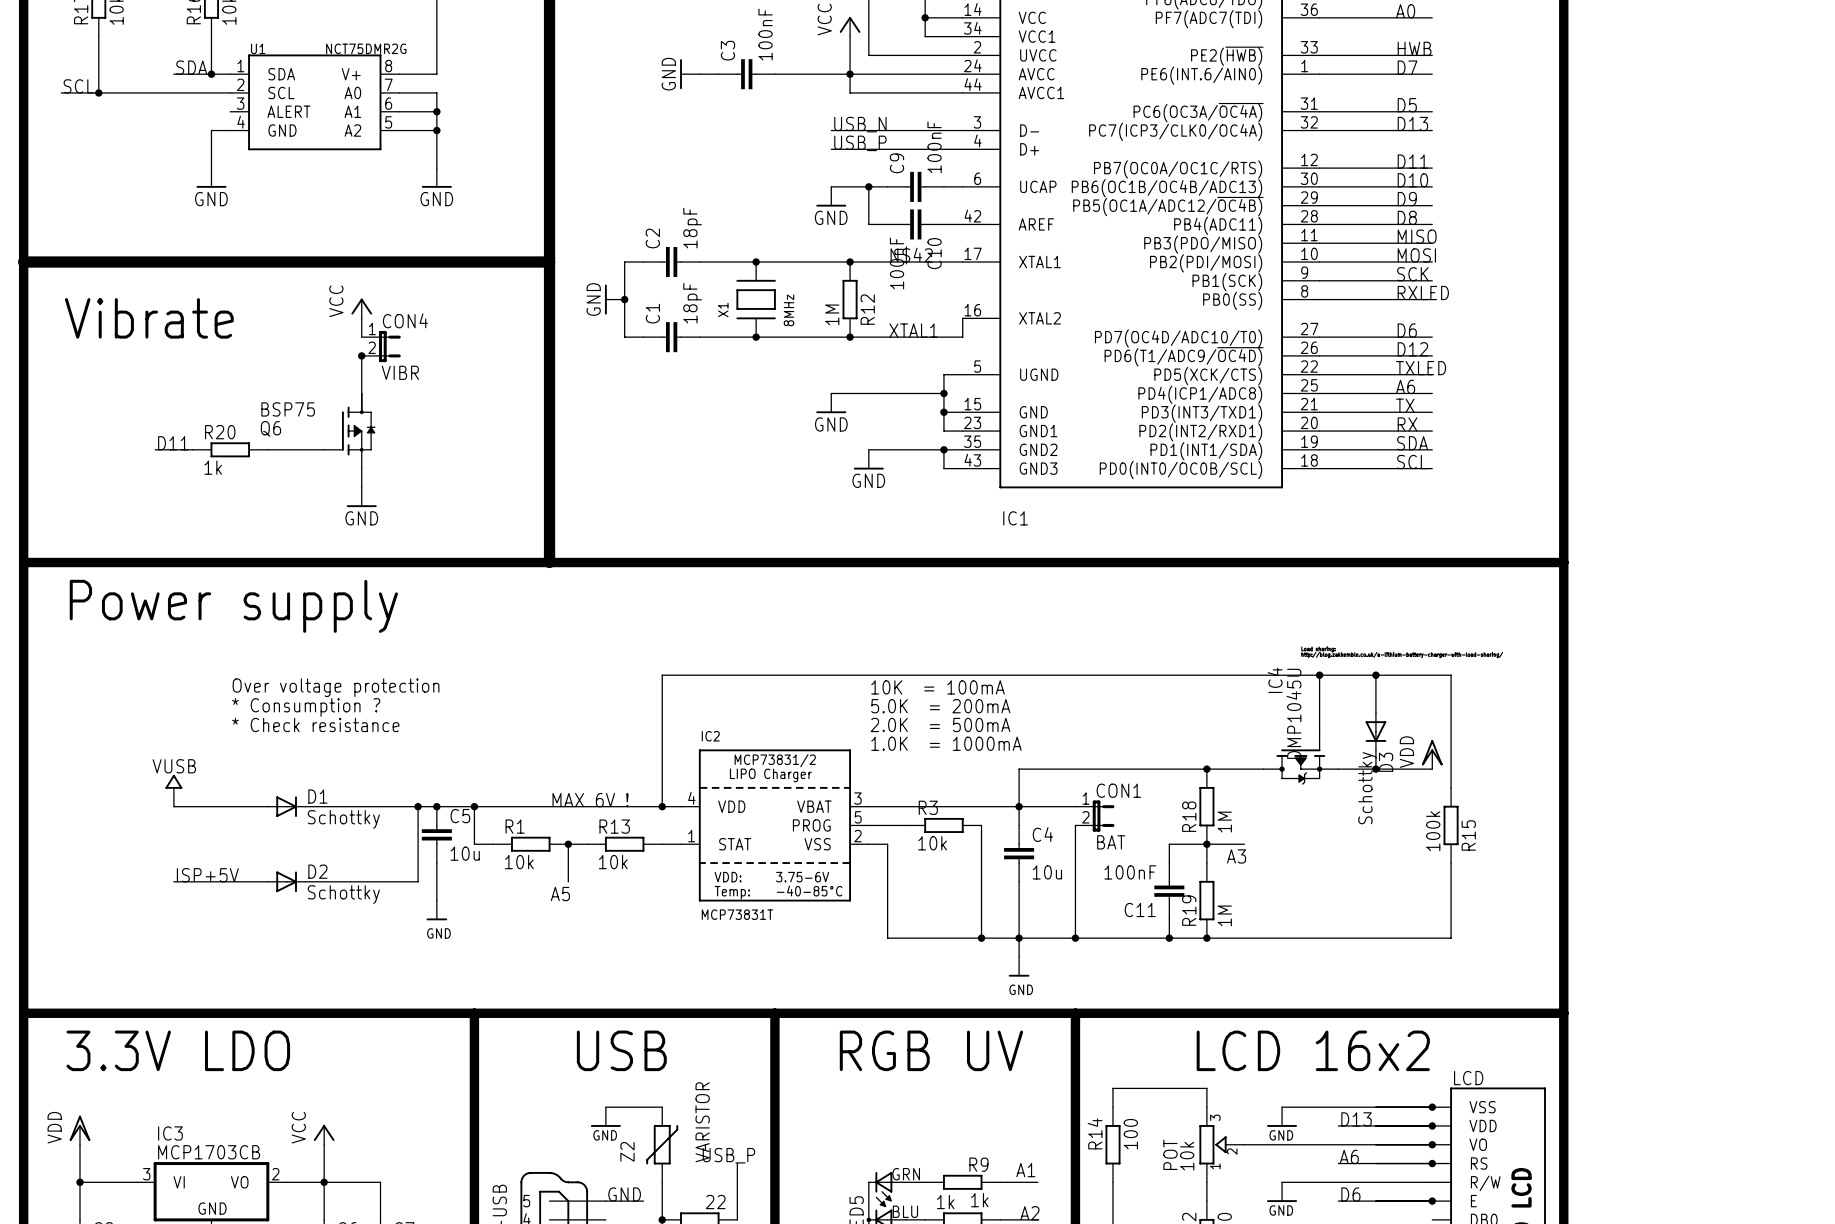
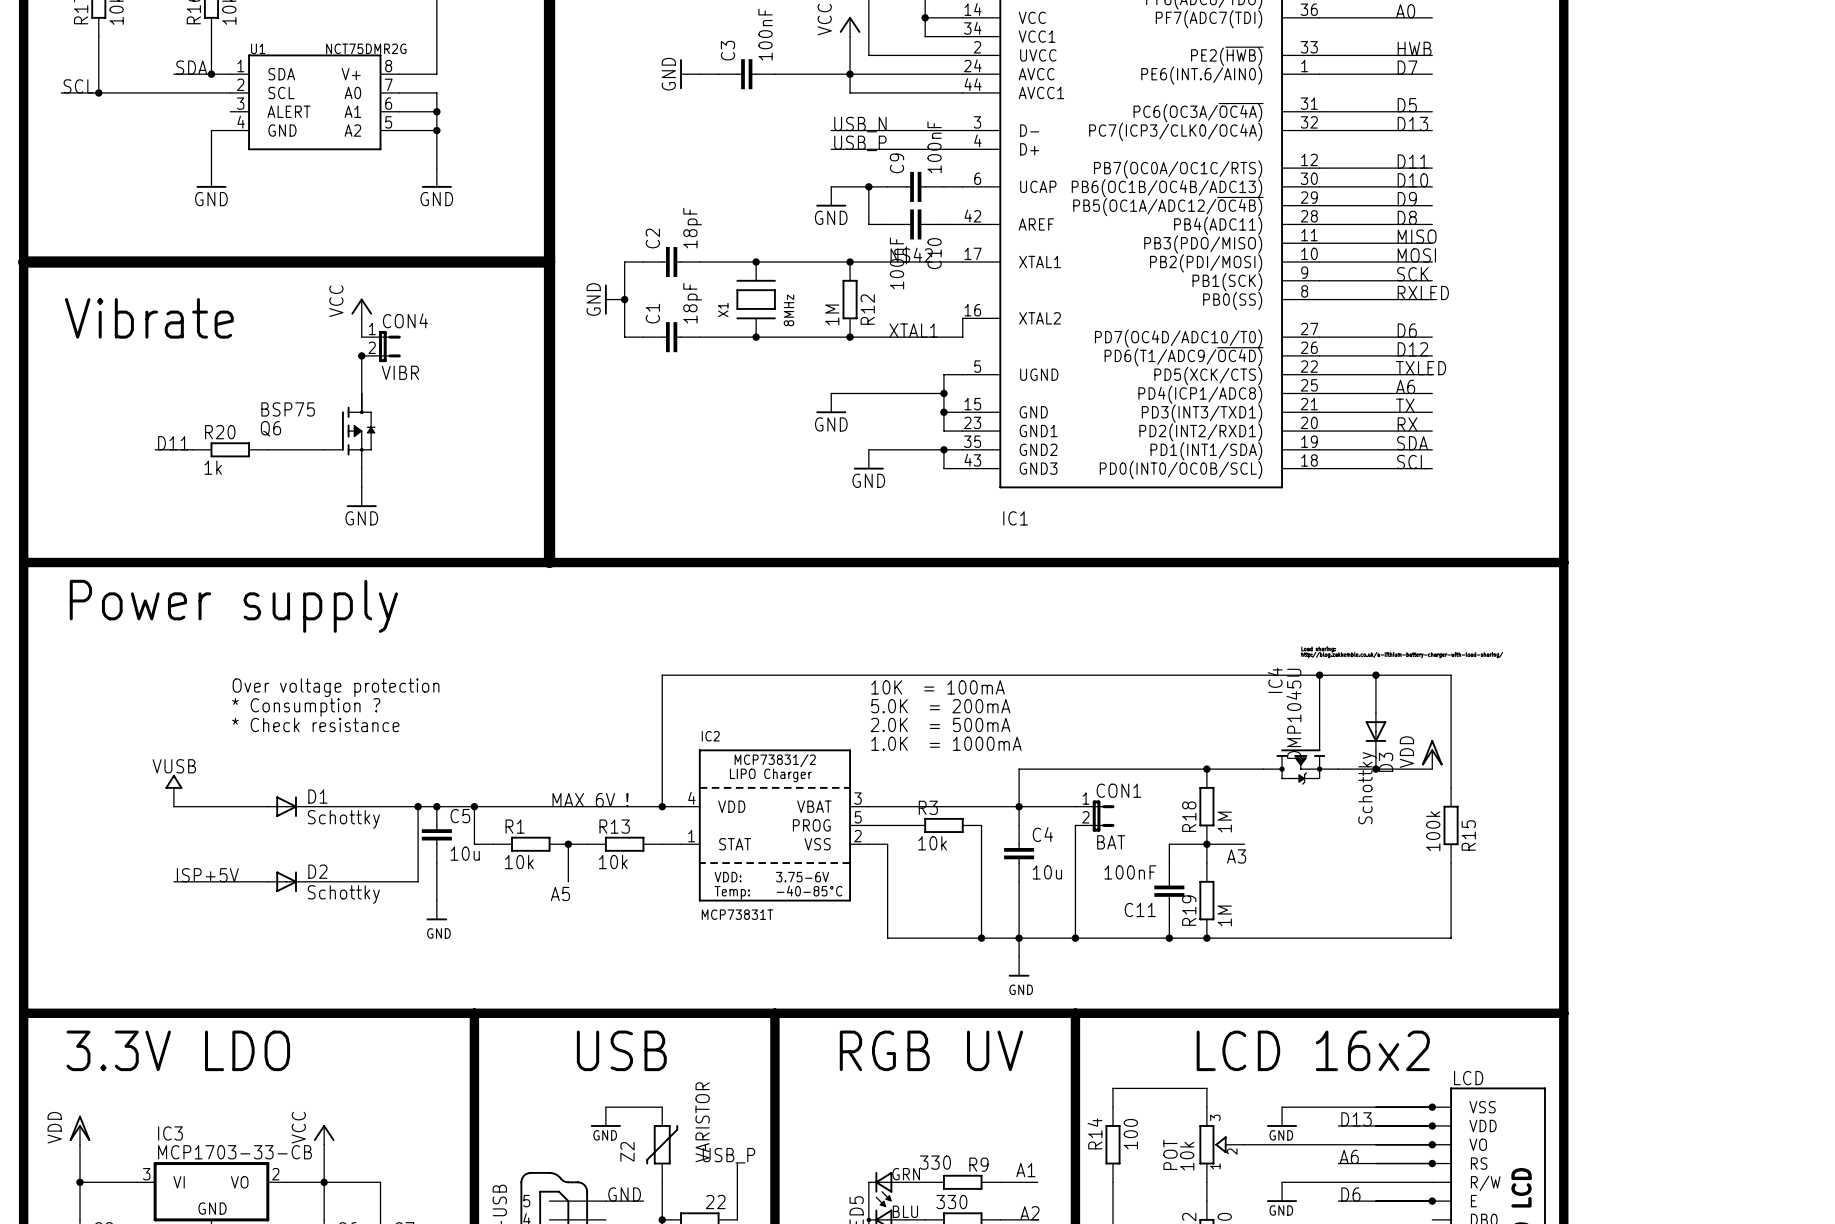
IC3 value: MCP1703CB (209, 1152) -> MCP1703-33-CB (234, 1152)
R9 value: 1k (979, 1200) -> 330 (935, 1162)
part value: 1k (945, 1202) -> 330 (951, 1202)

